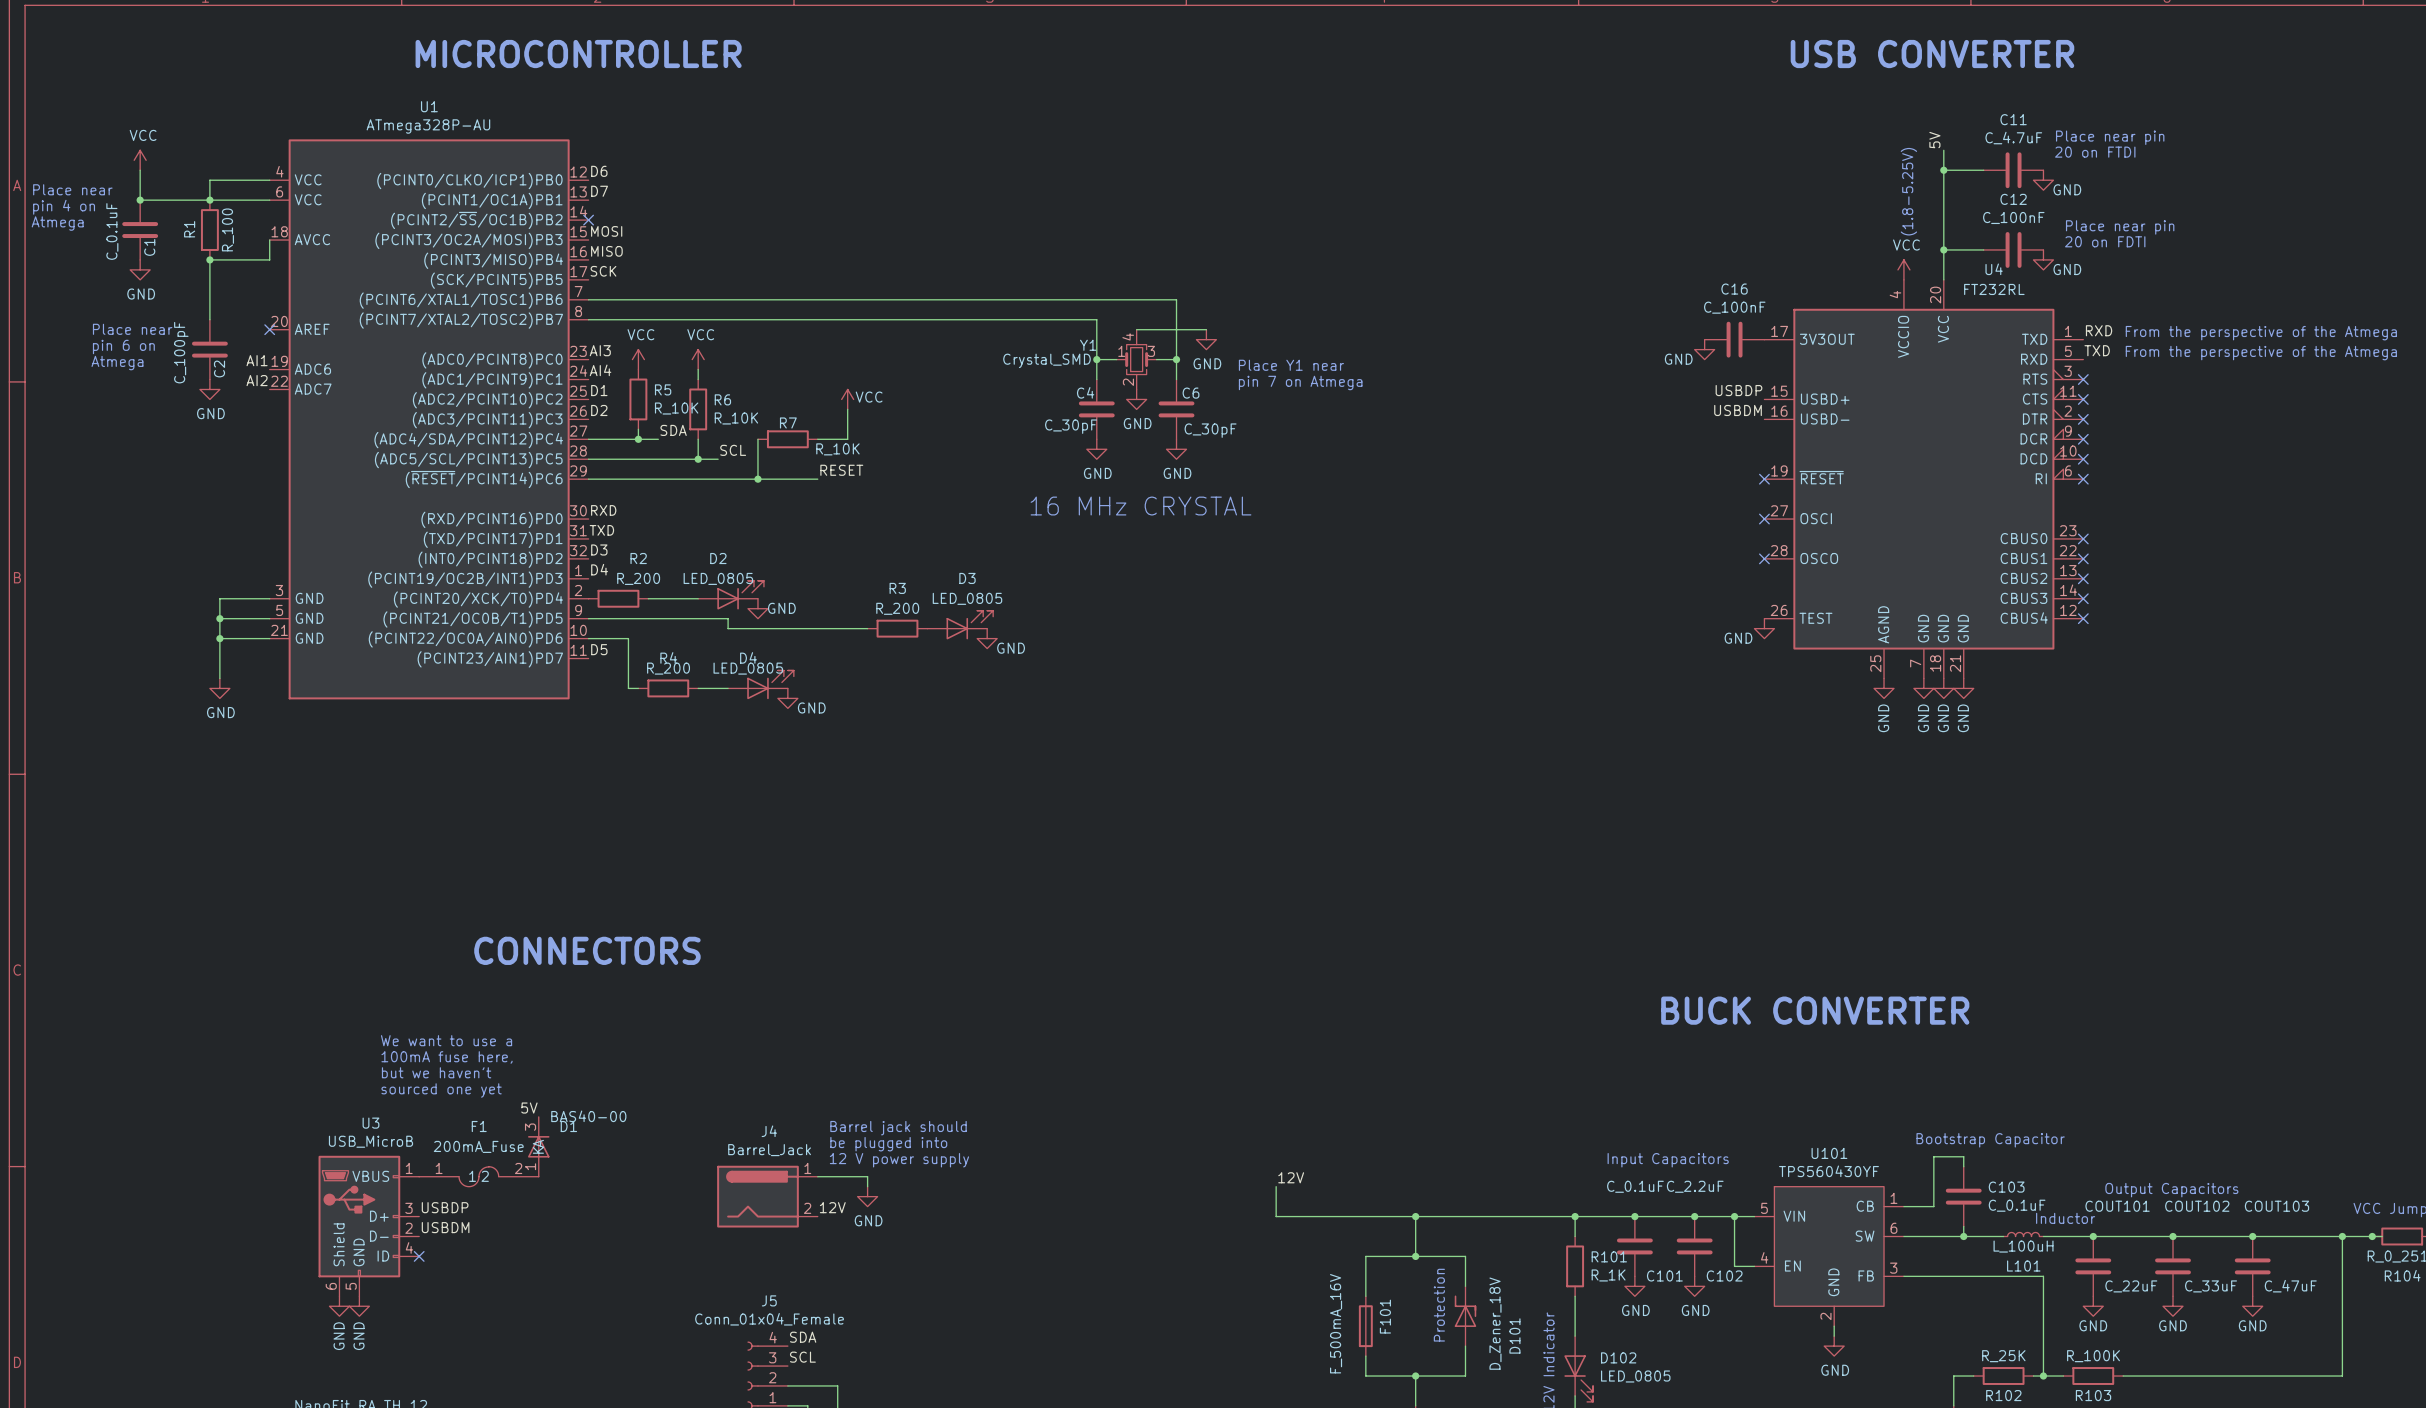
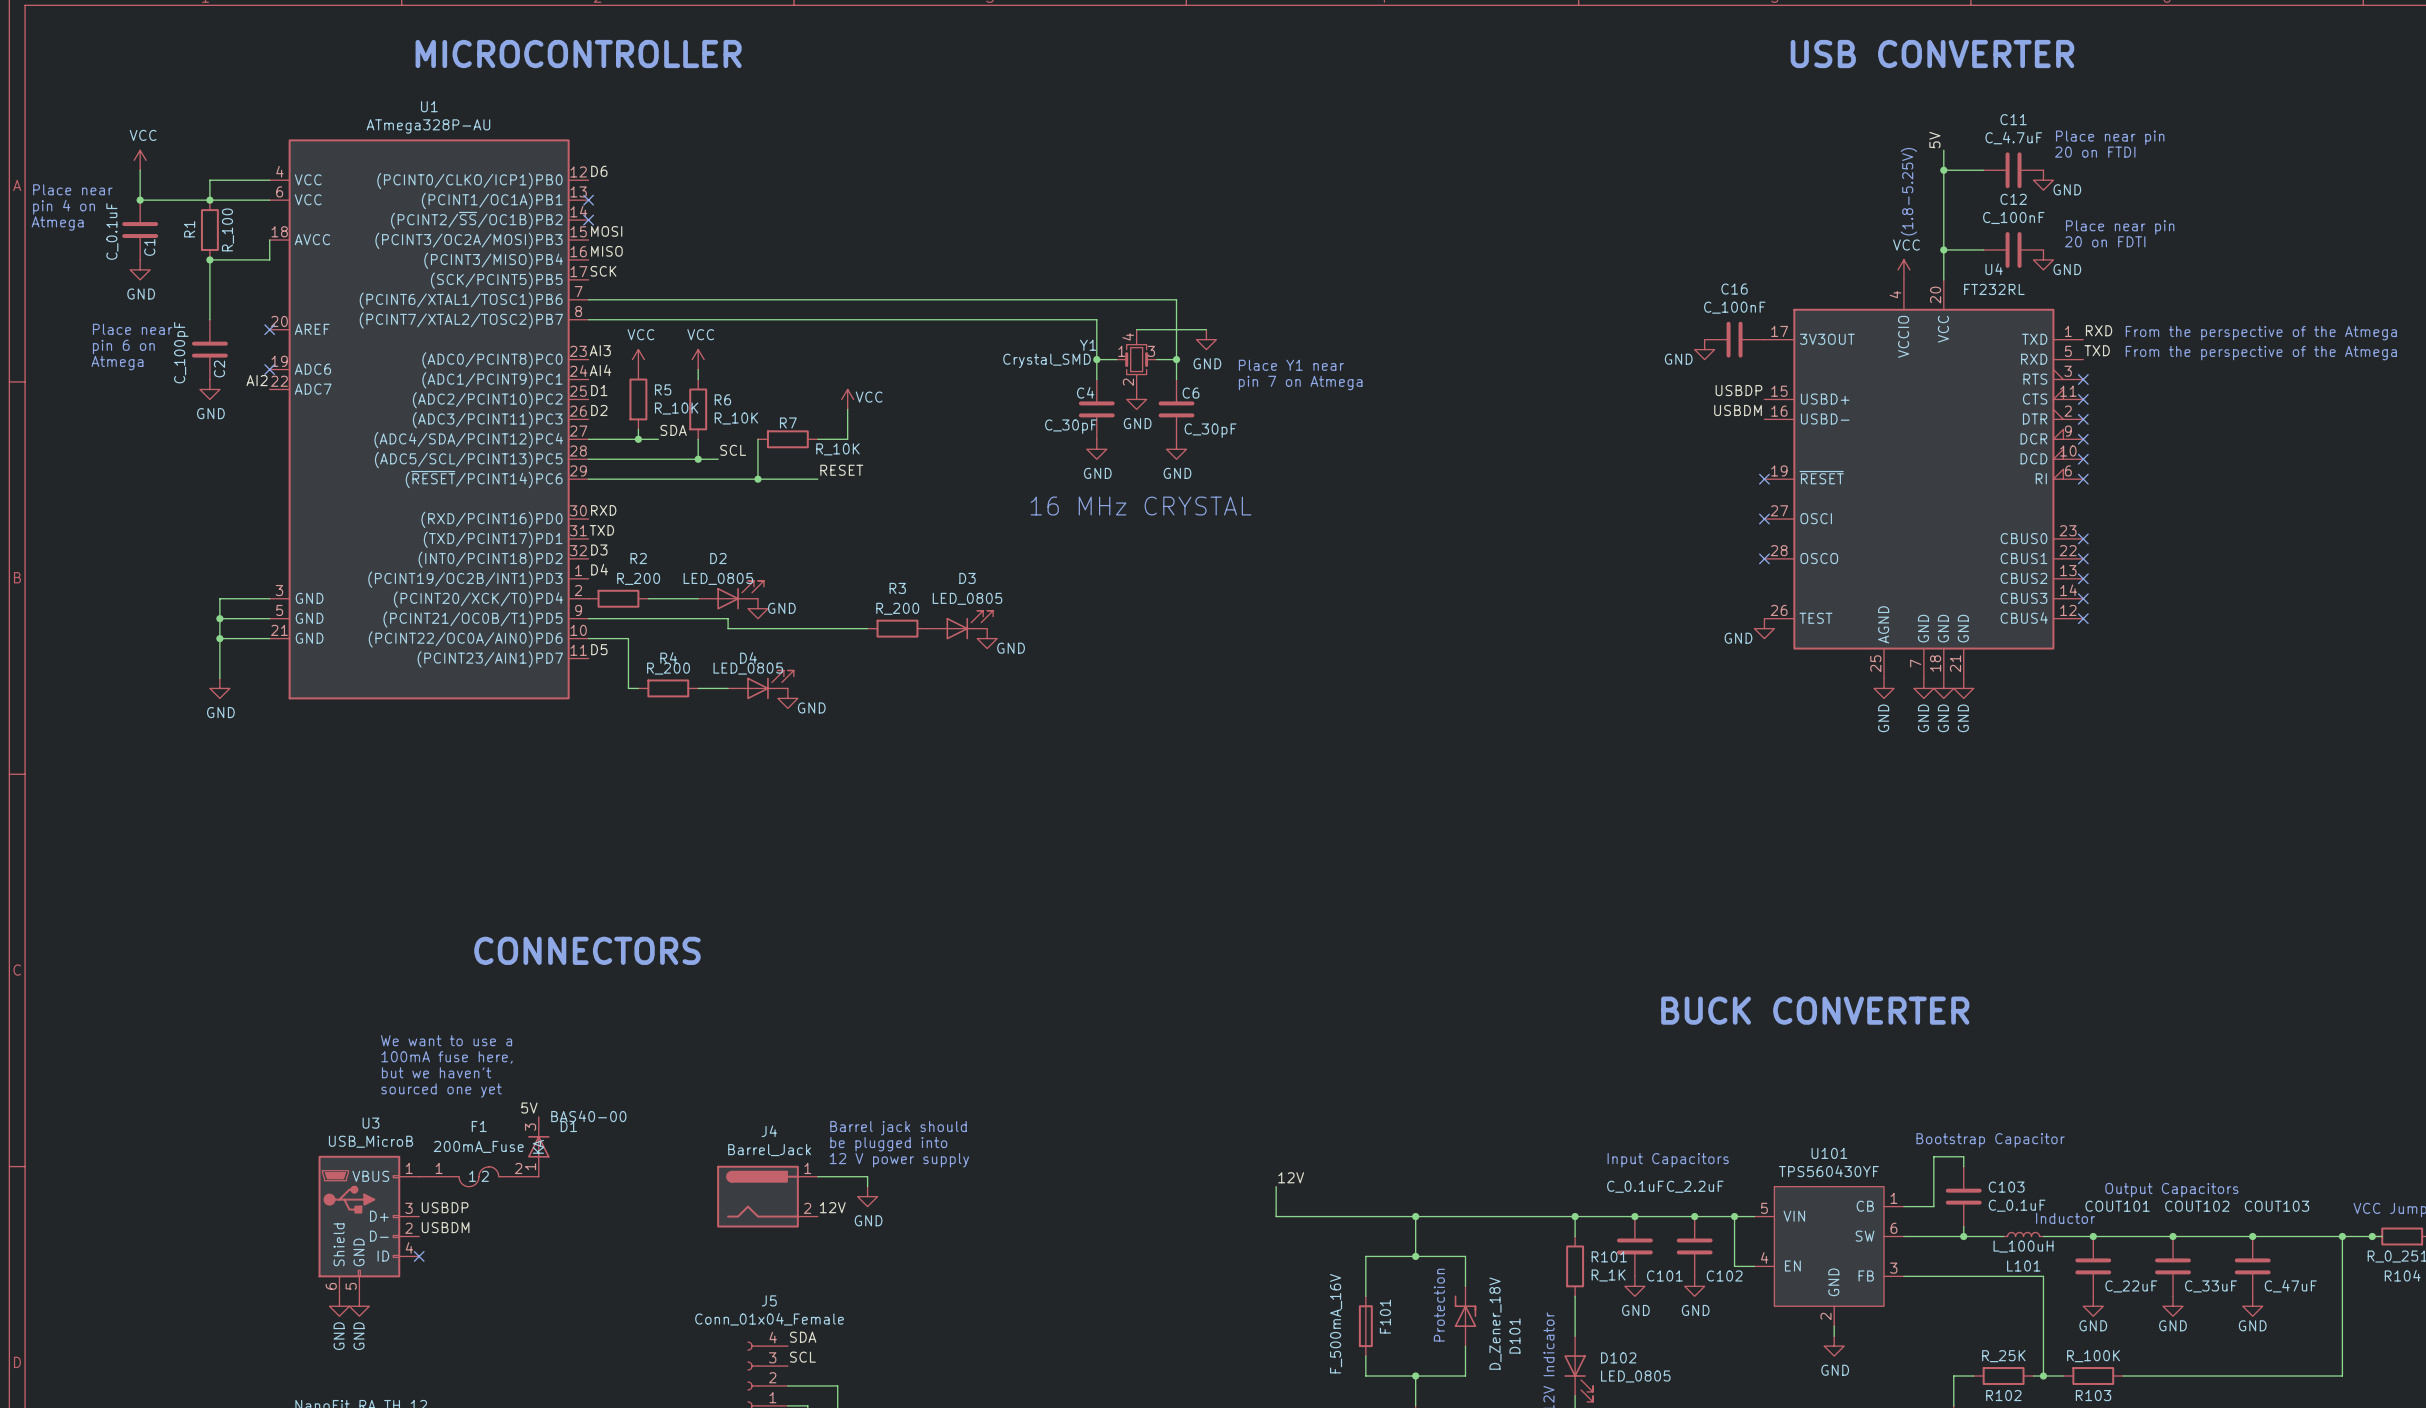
label: D7 (599, 191) -> none
no-connect mark: none -> (588, 200)
label: AI1 (257, 360) -> none
no-connect mark: none -> (269, 369)

